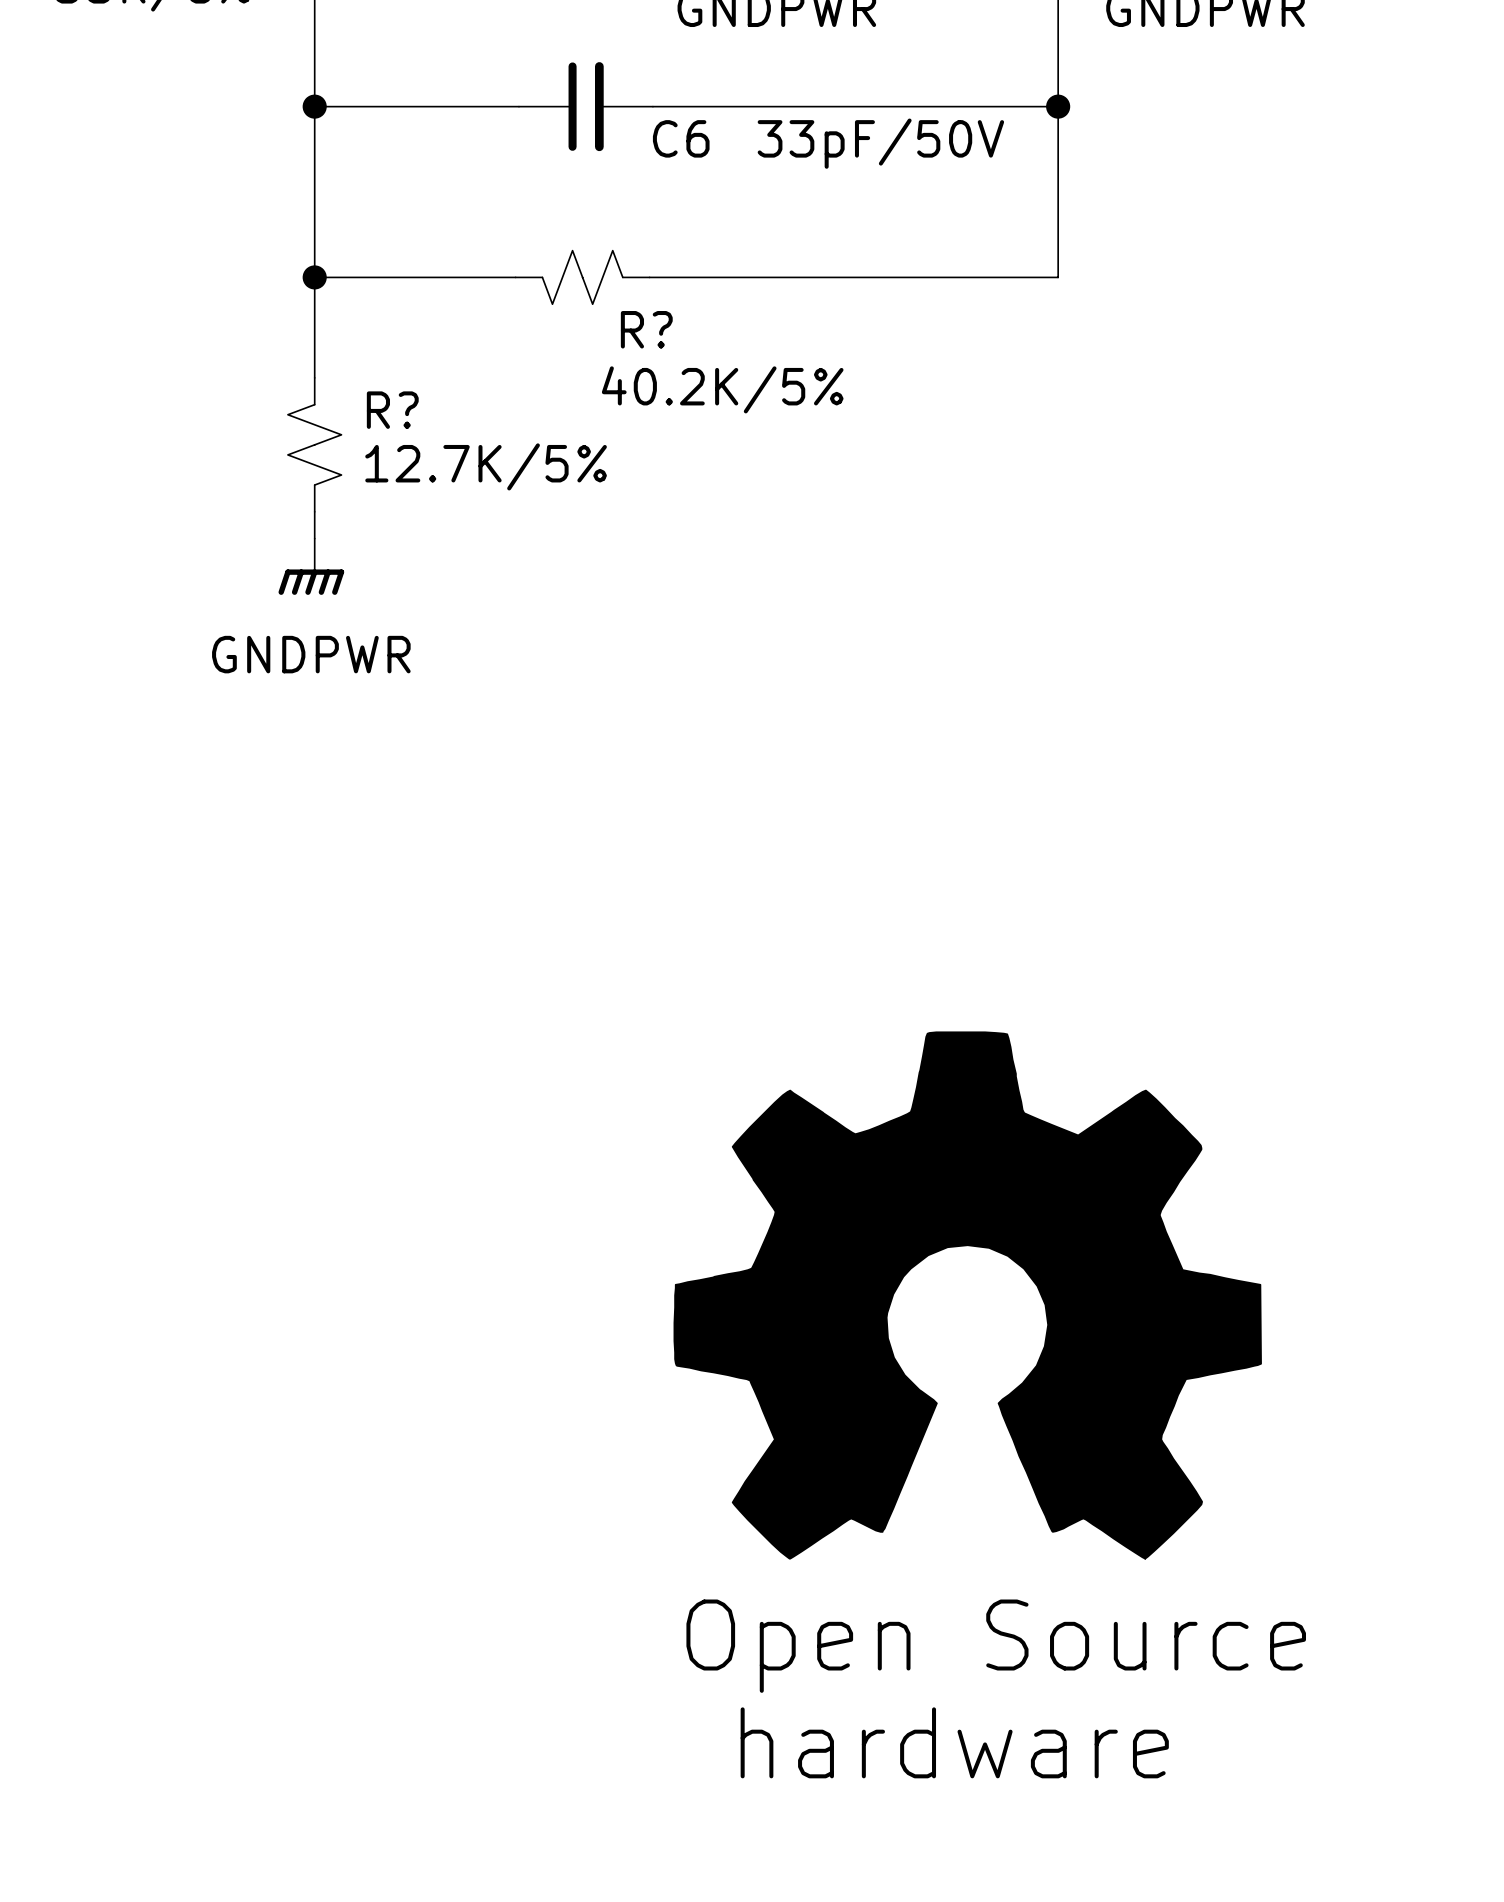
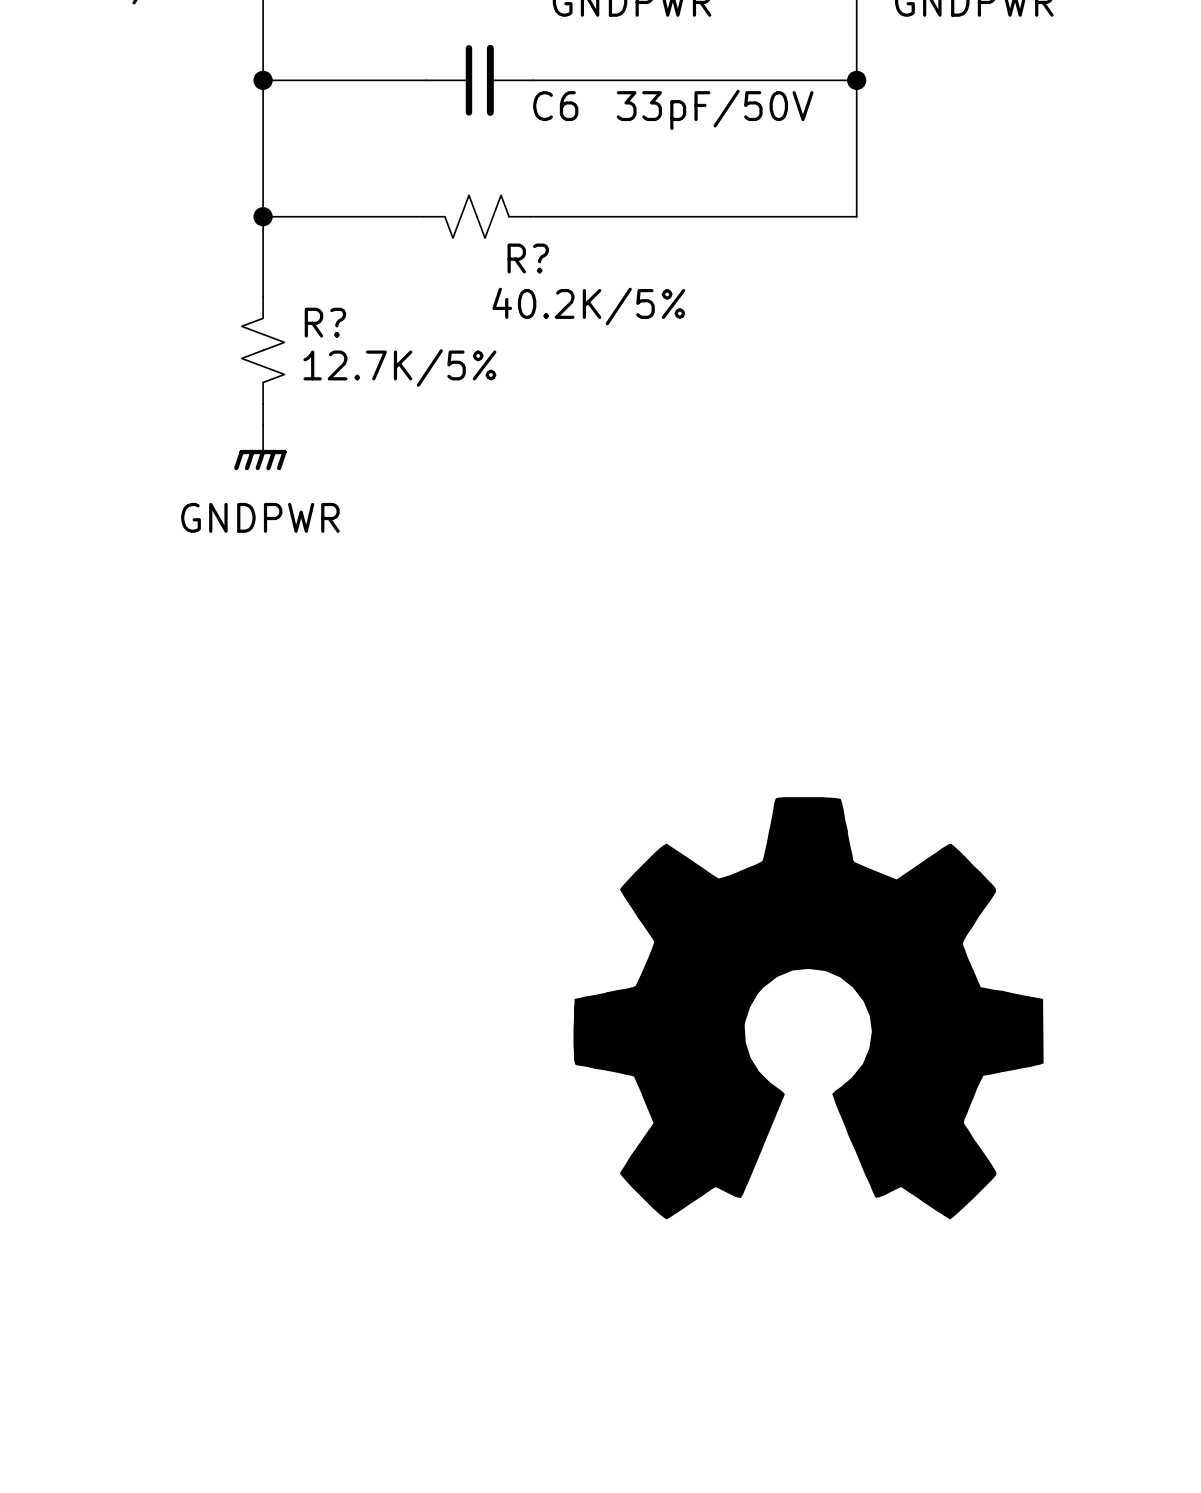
power symbol position: (967, 1295) -> (808, 1008)
text: Open Source (996, 1646) -> none
text: hardware (954, 1742) -> none

